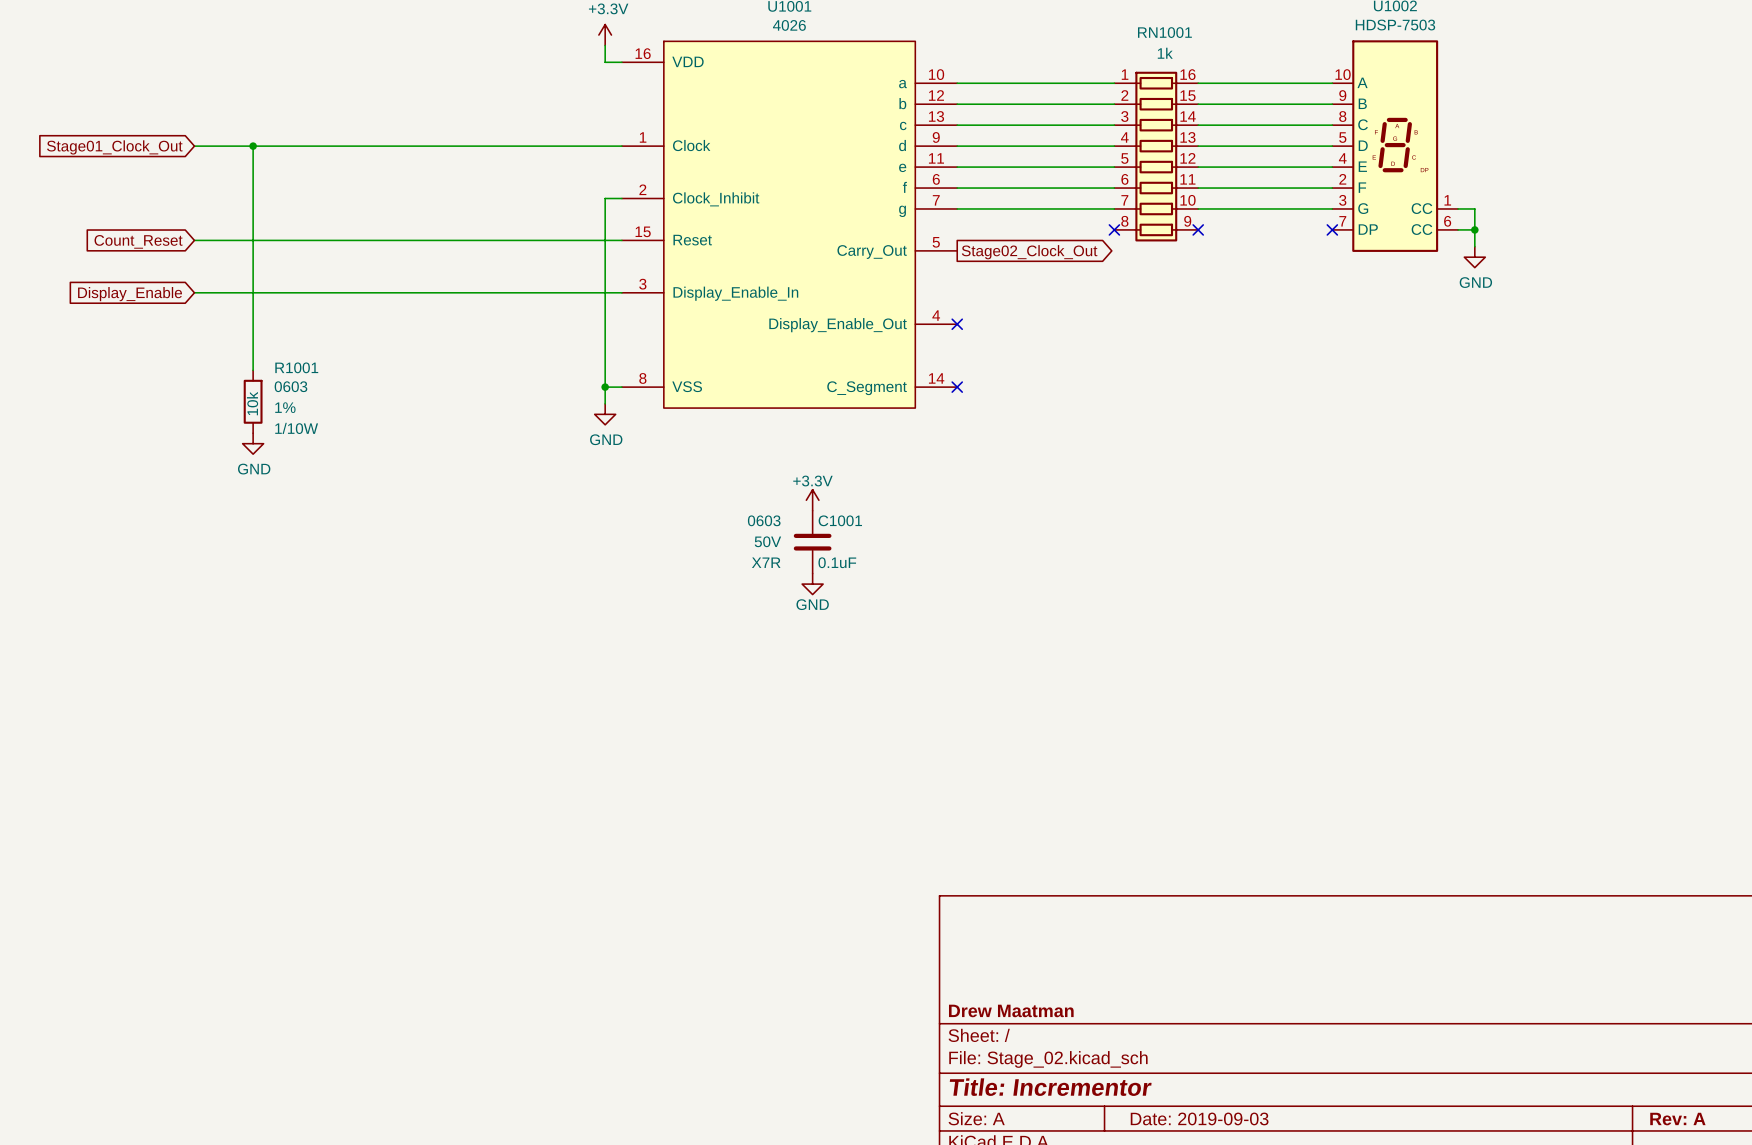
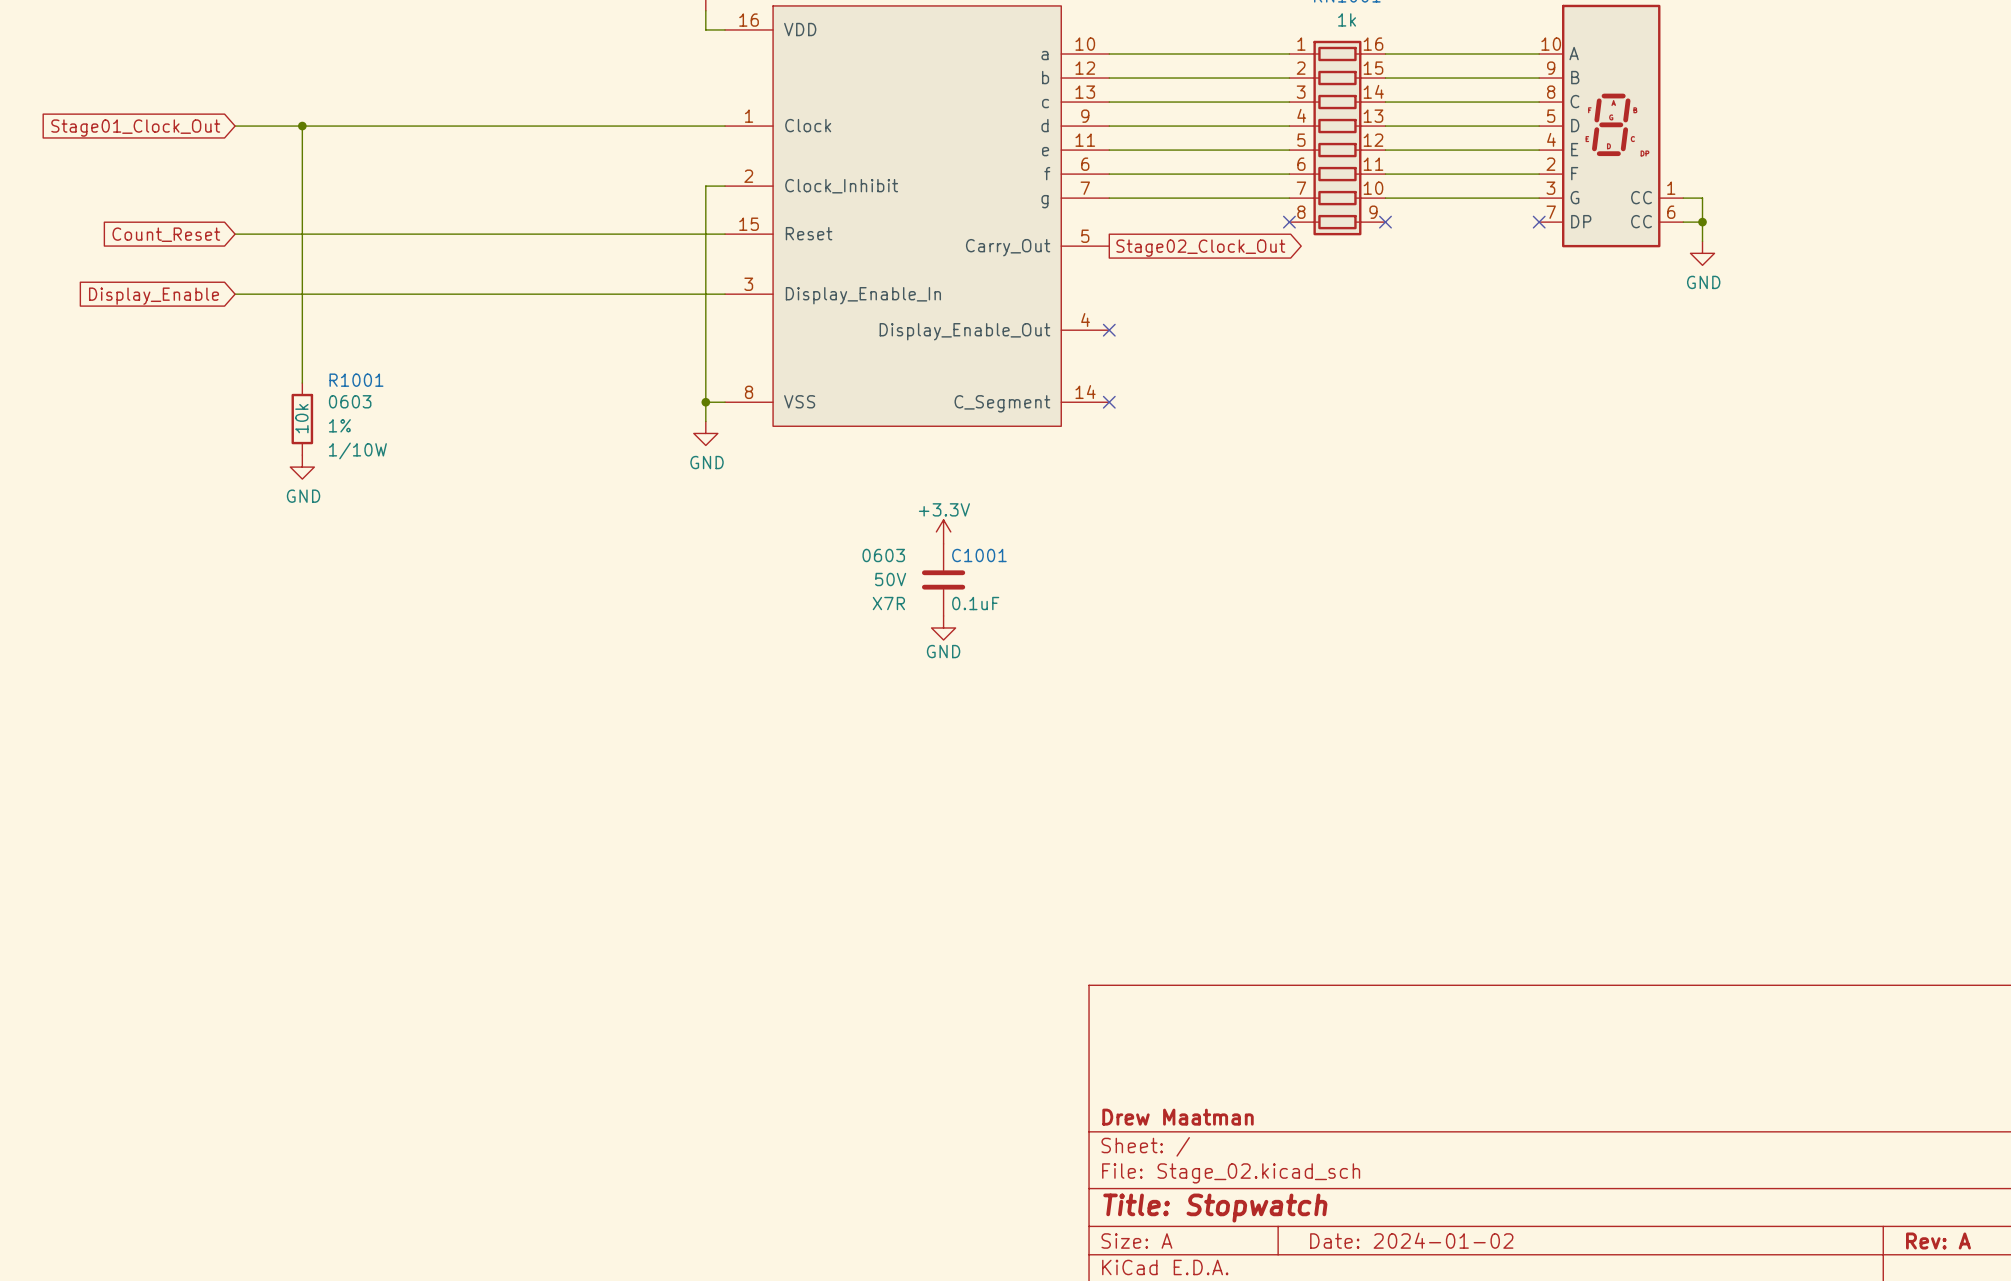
title block: Title: Incrementor (1050, 1087) -> Title: Stopwatch (1215, 1208)
title block: Date: 2019-09-03 (1199, 1118) -> Date: 2024-01-02 (1411, 1240)

